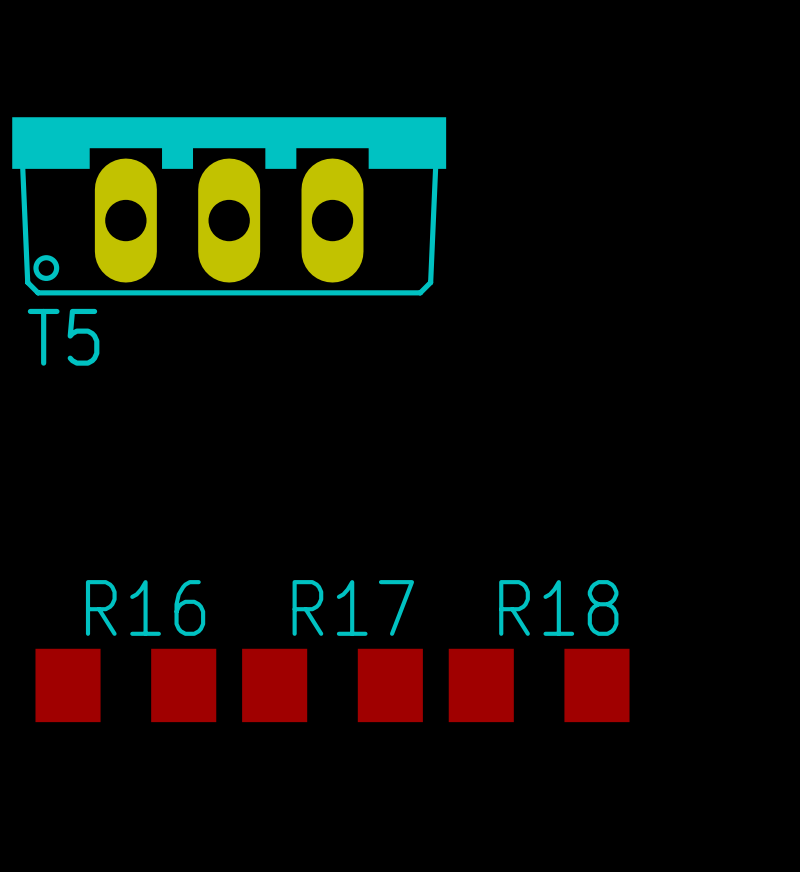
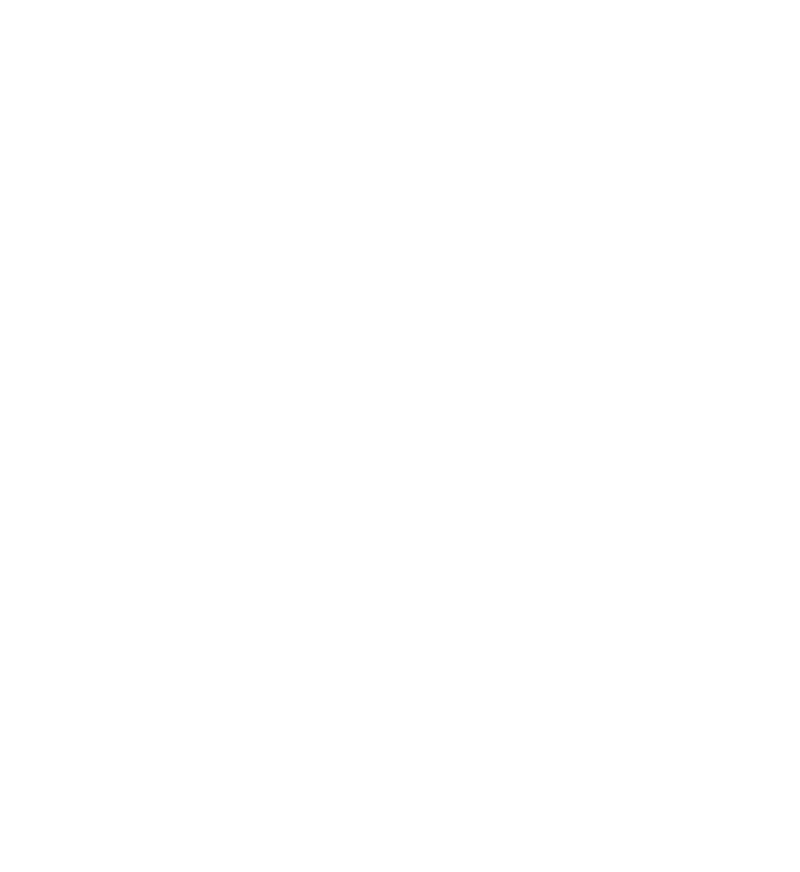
T5: (229, 206) -> none
R16: (125, 685) -> none
R17: (332, 685) -> none
R18: (539, 685) -> none

